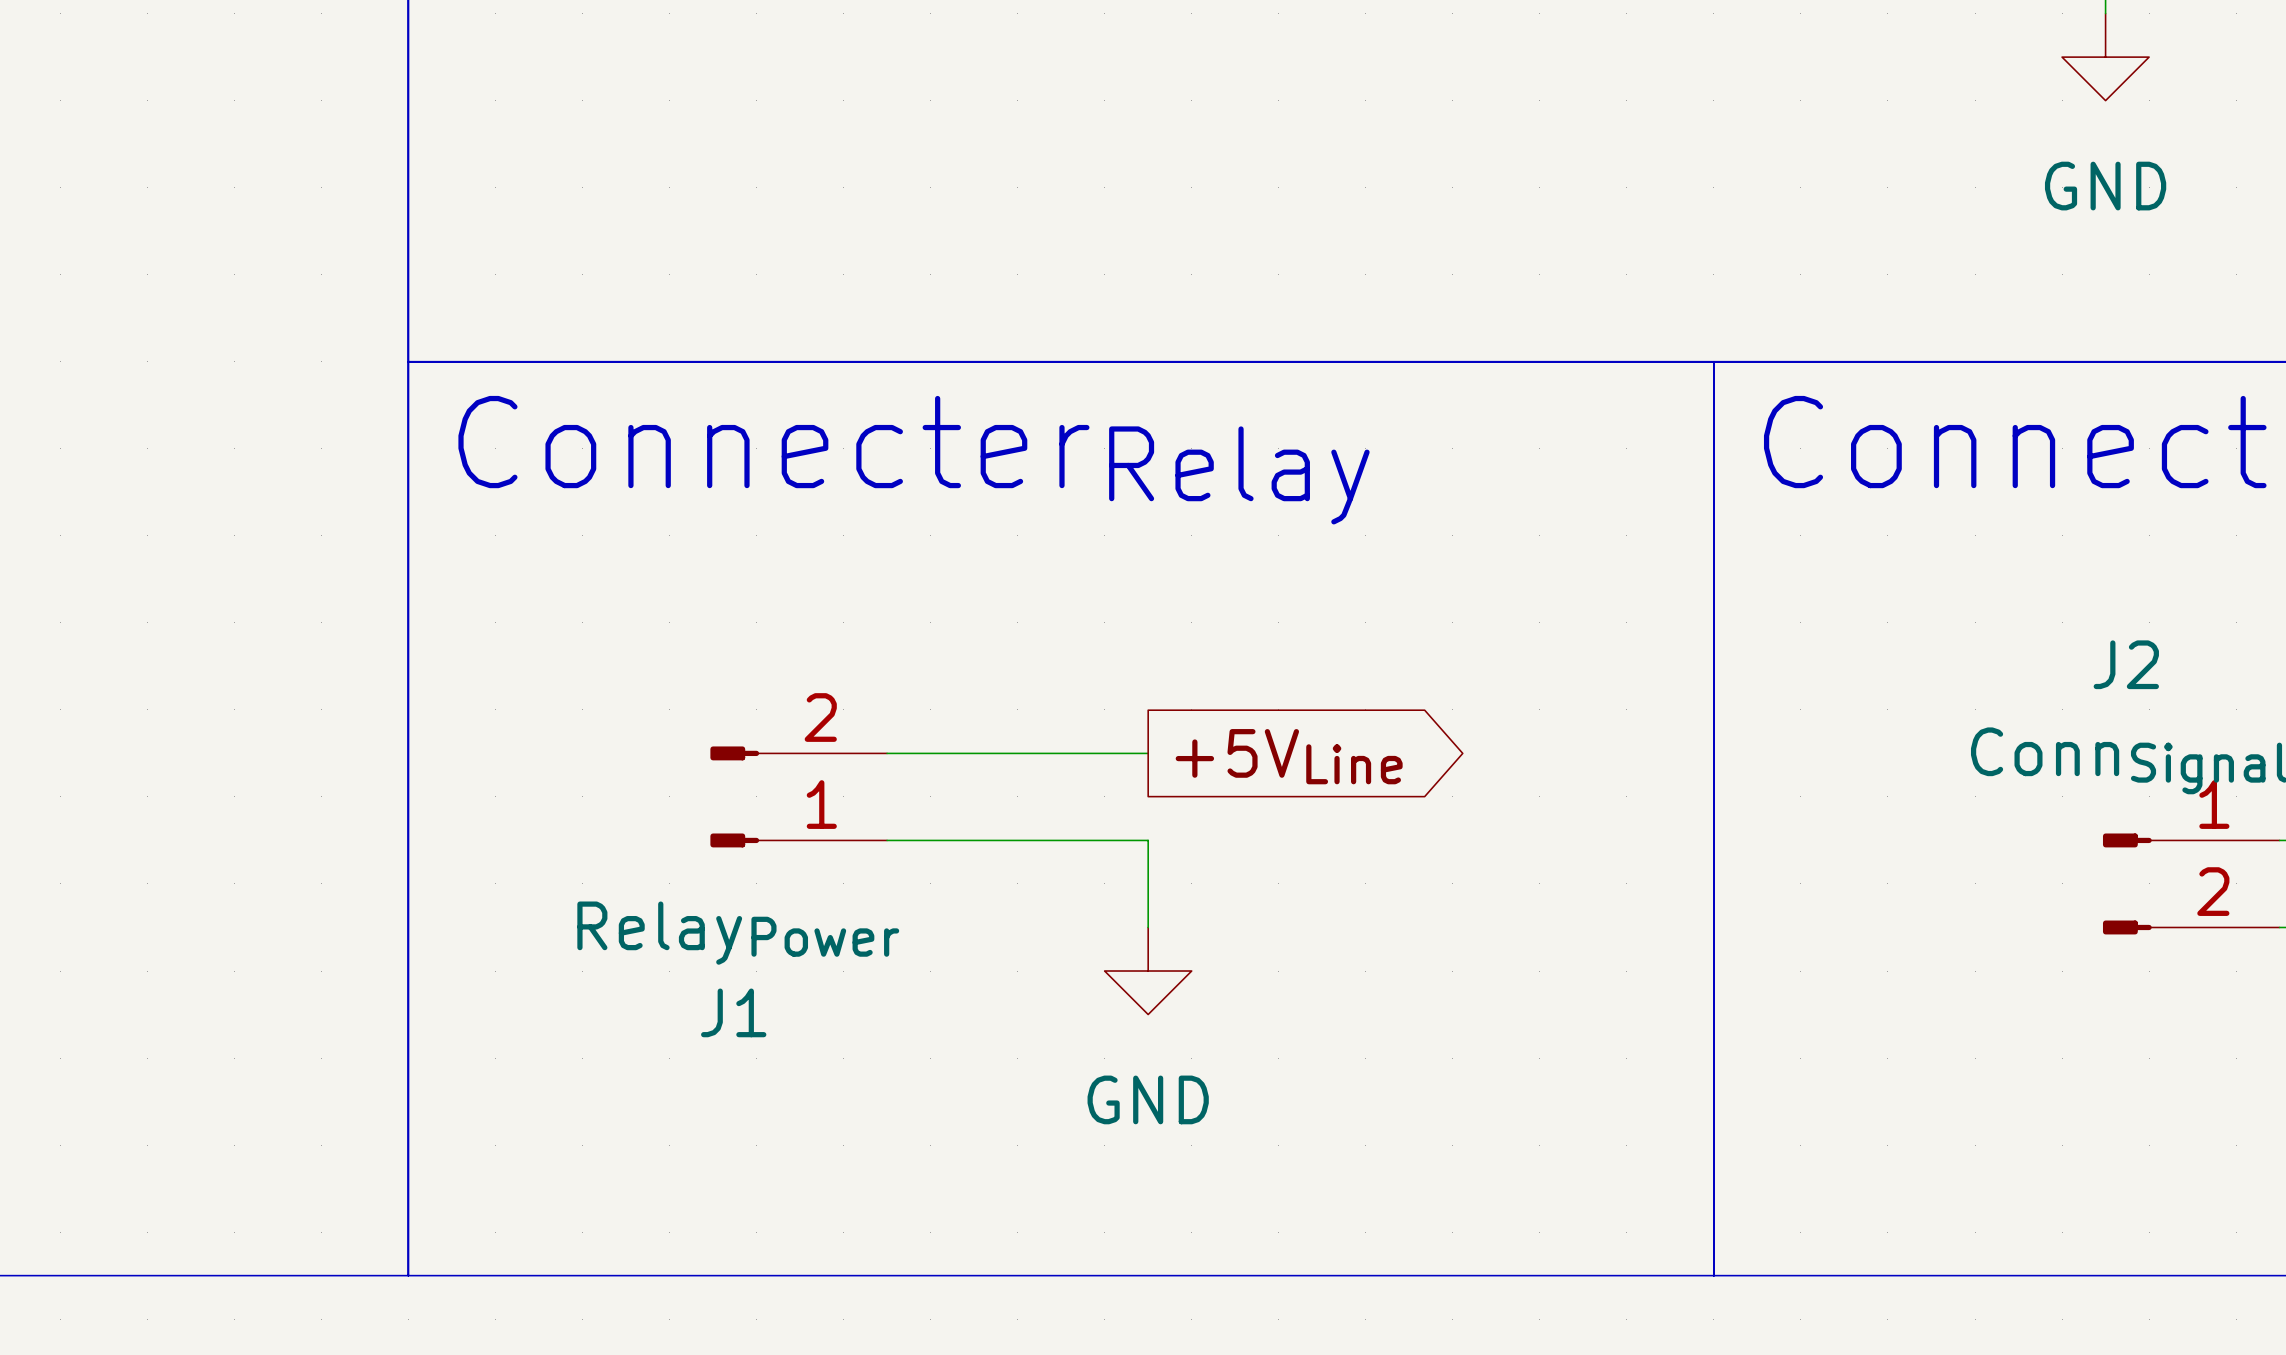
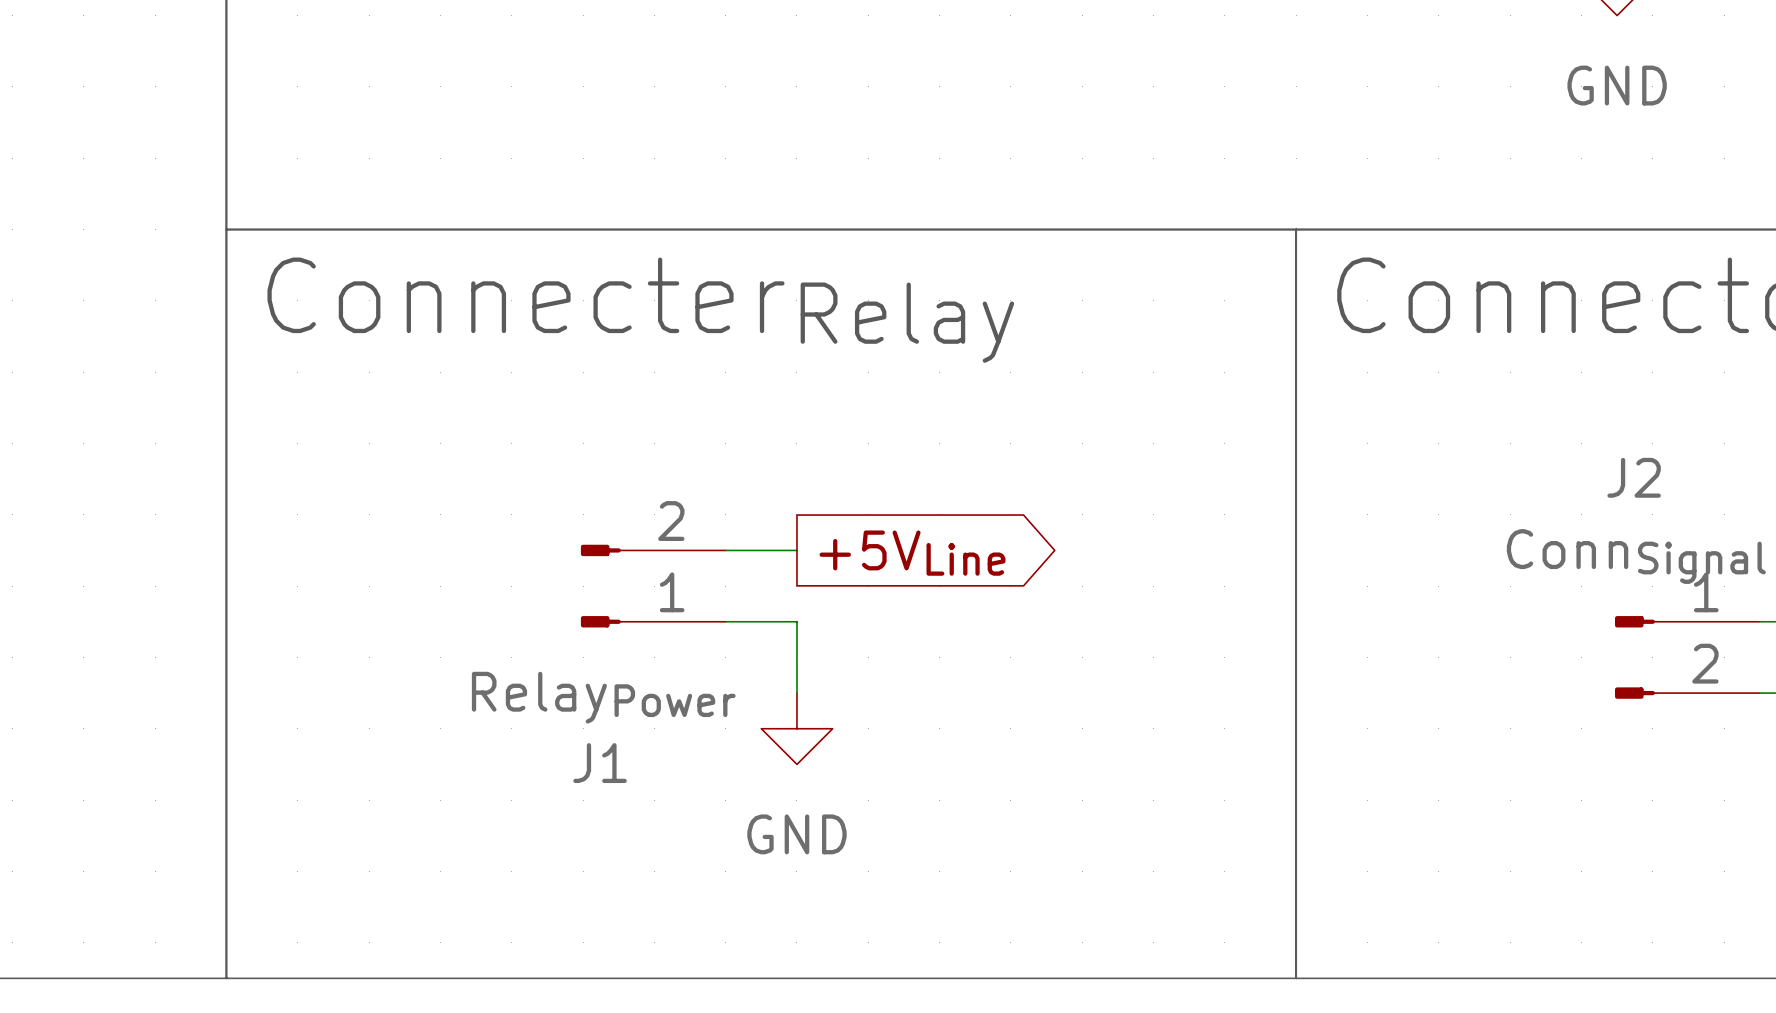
wire: (1104, 753) (1148, 753) -> none
global label position: +5VLine (1289, 756) -> +5VLine (912, 553)
J1 position: (798, 796) -> (653, 586)
wire: (1104, 840) (1148, 840) (1148, 927) -> (796, 621) (796, 693)
power symbol position: GND (1148, 971) -> GND (796, 728)

